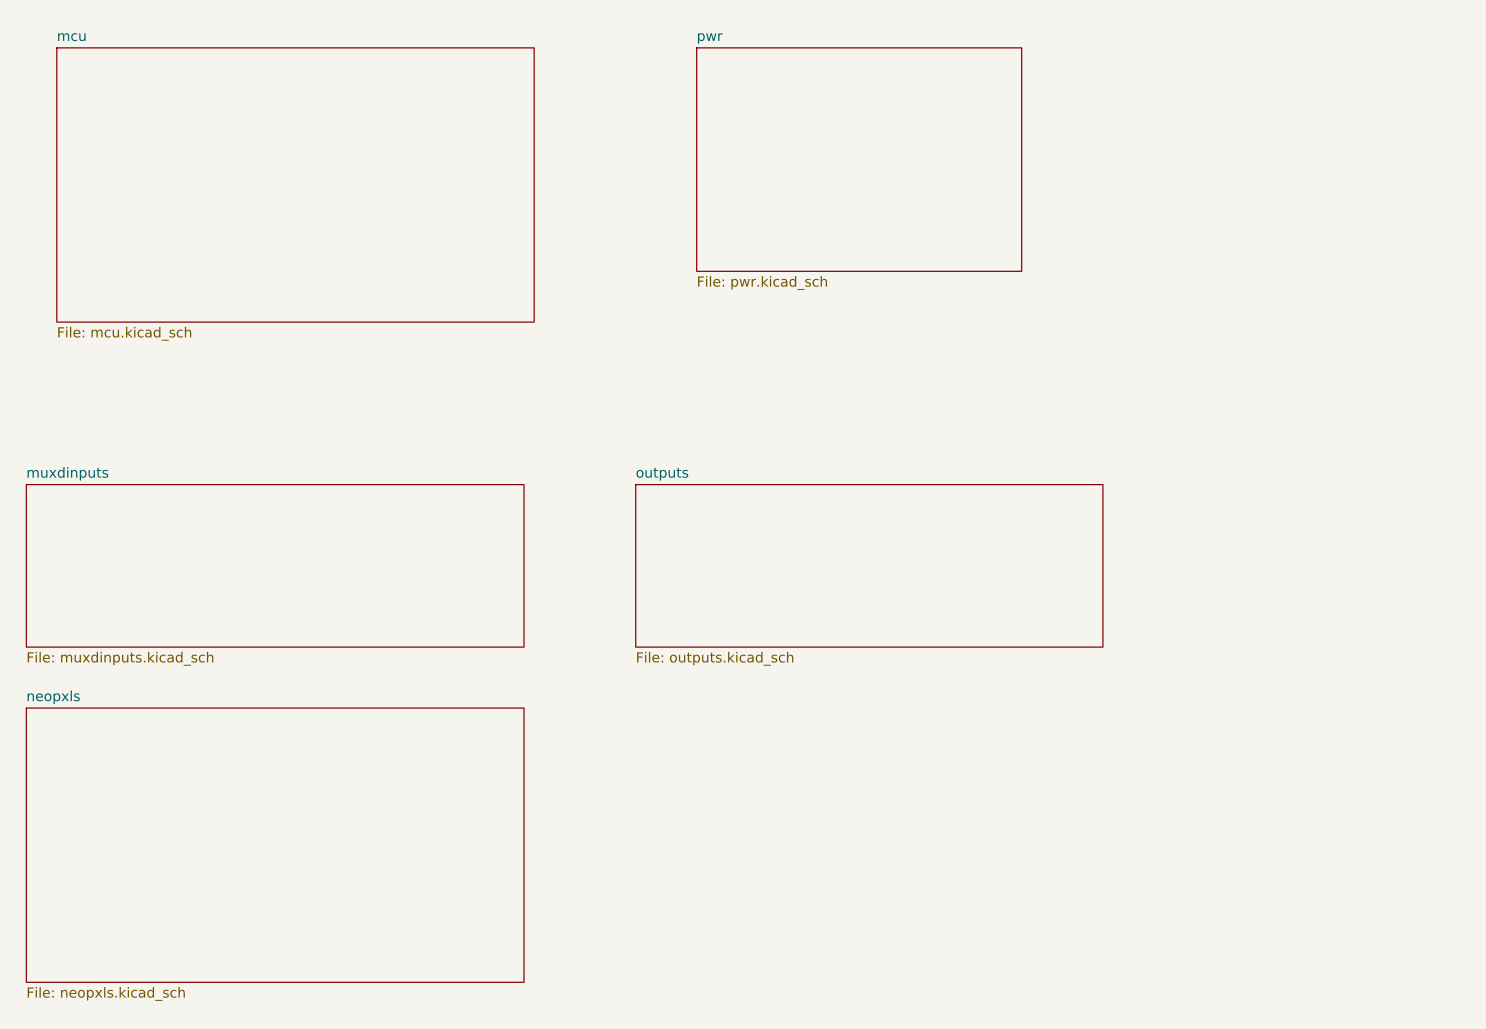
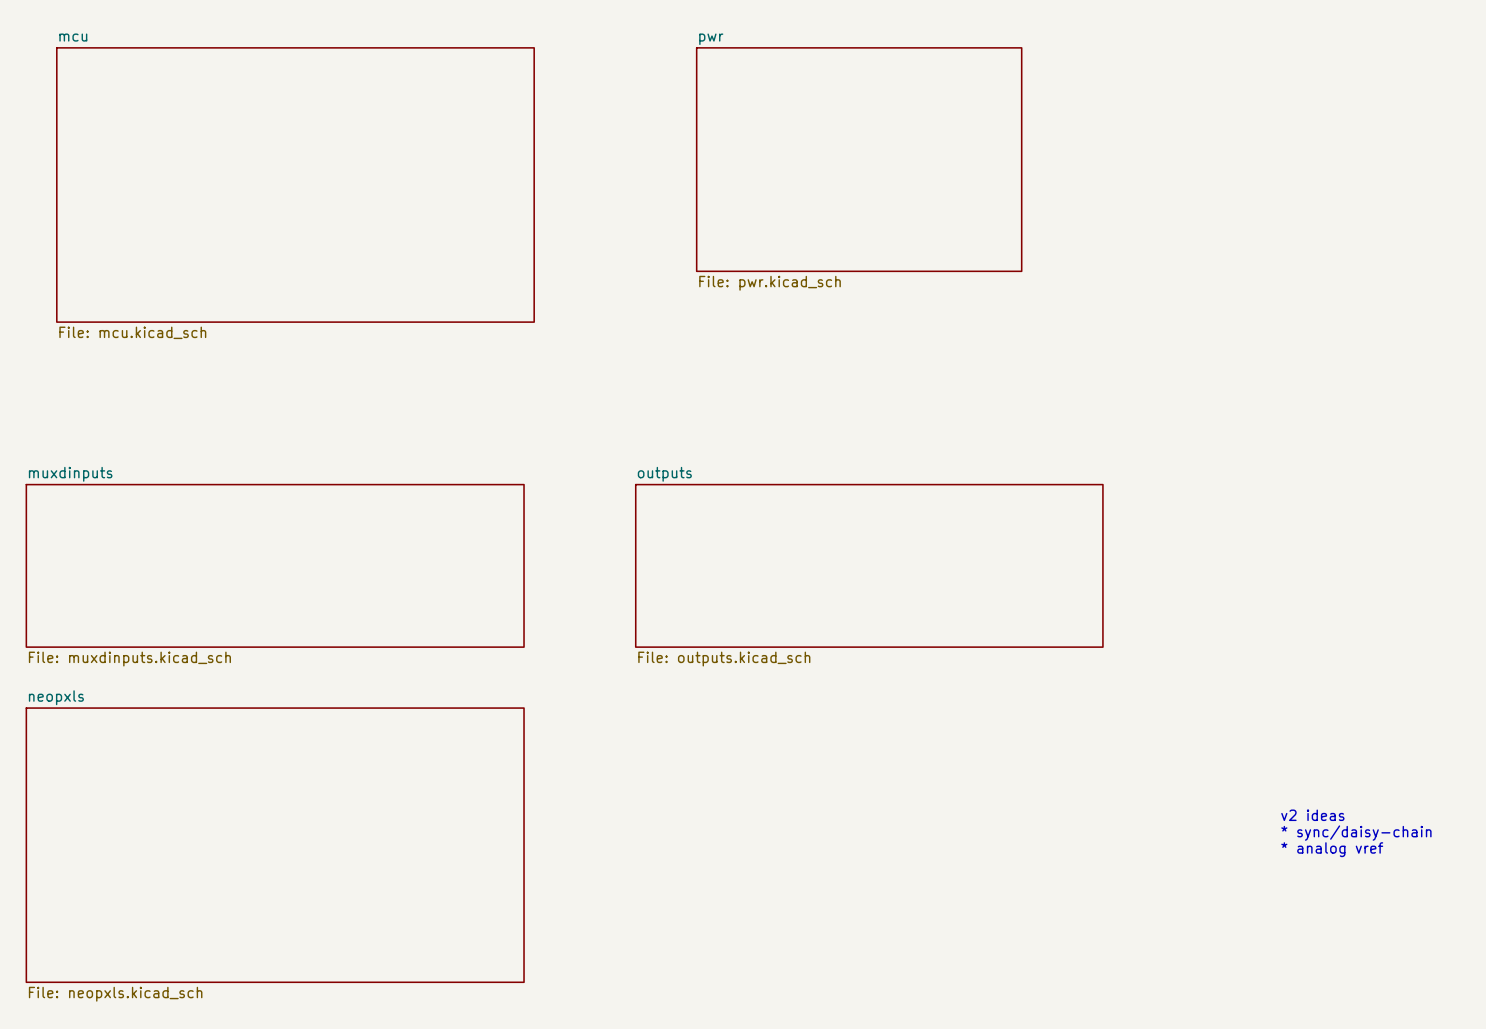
text: none -> v2 ideas (1312, 815)
text: none -> * sync/daisy-chain (1356, 833)
text: none -> * analog vref (1332, 849)

